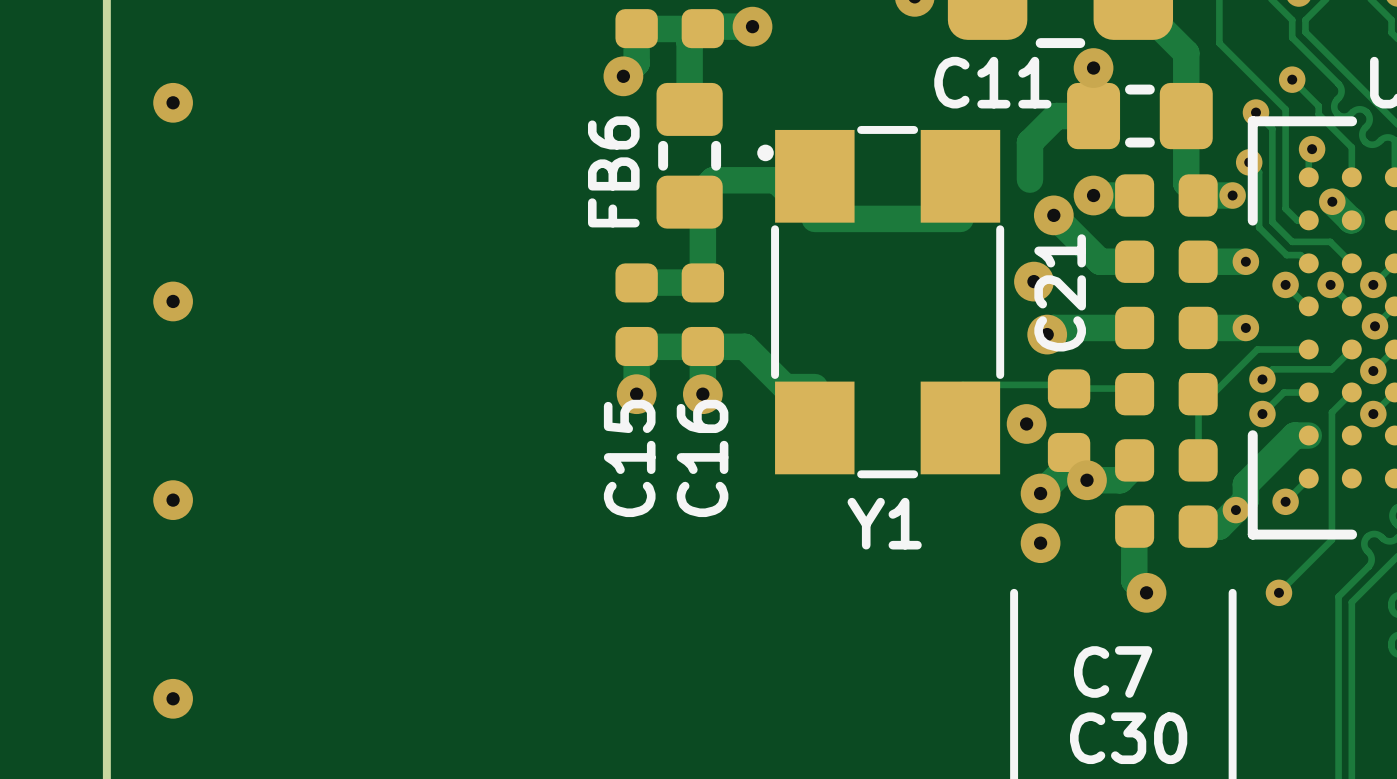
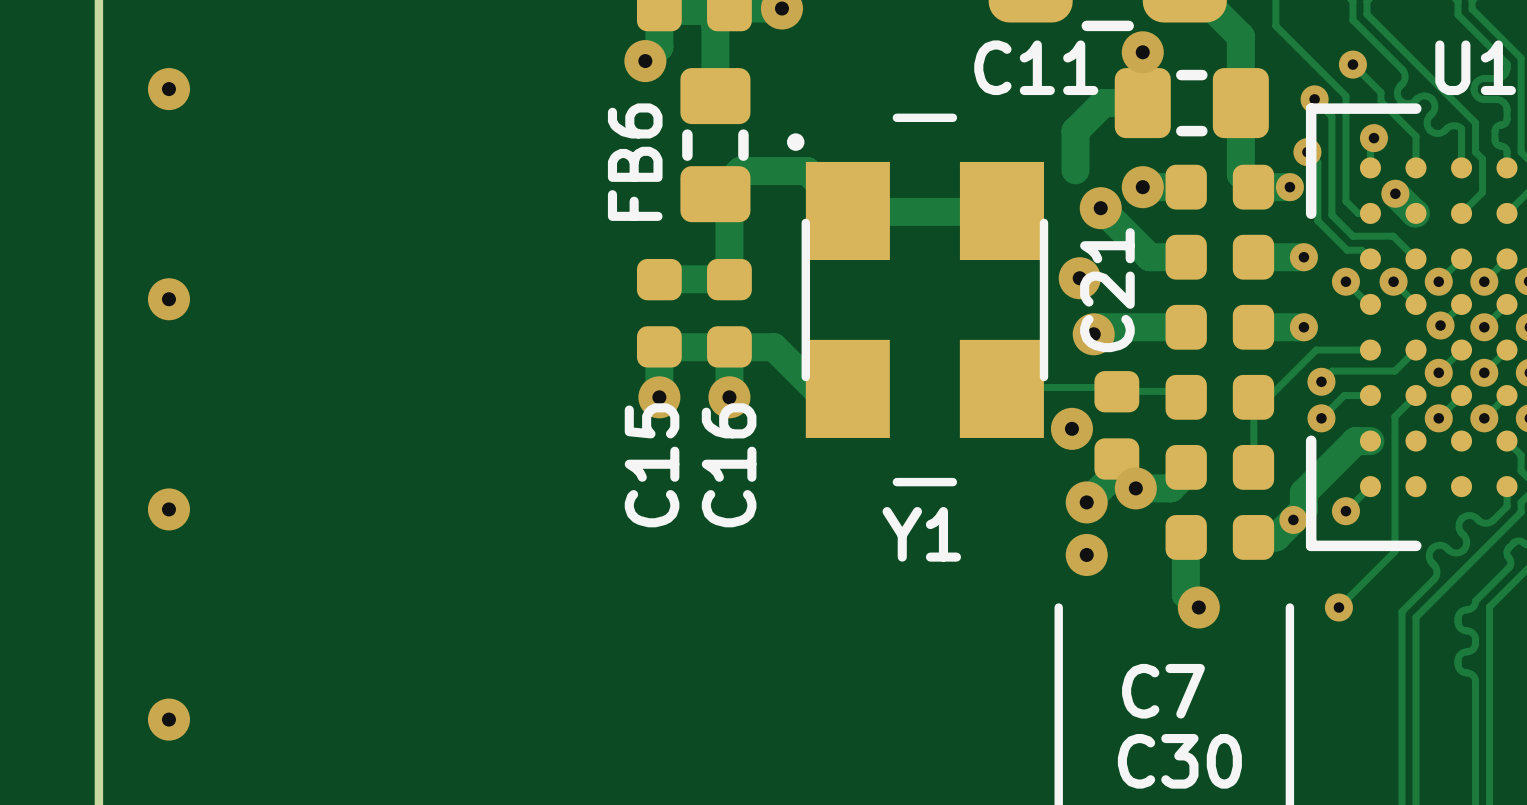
Y1 footprint: [757, 125, 1005, 479] -> [786, 113, 1049, 487]

